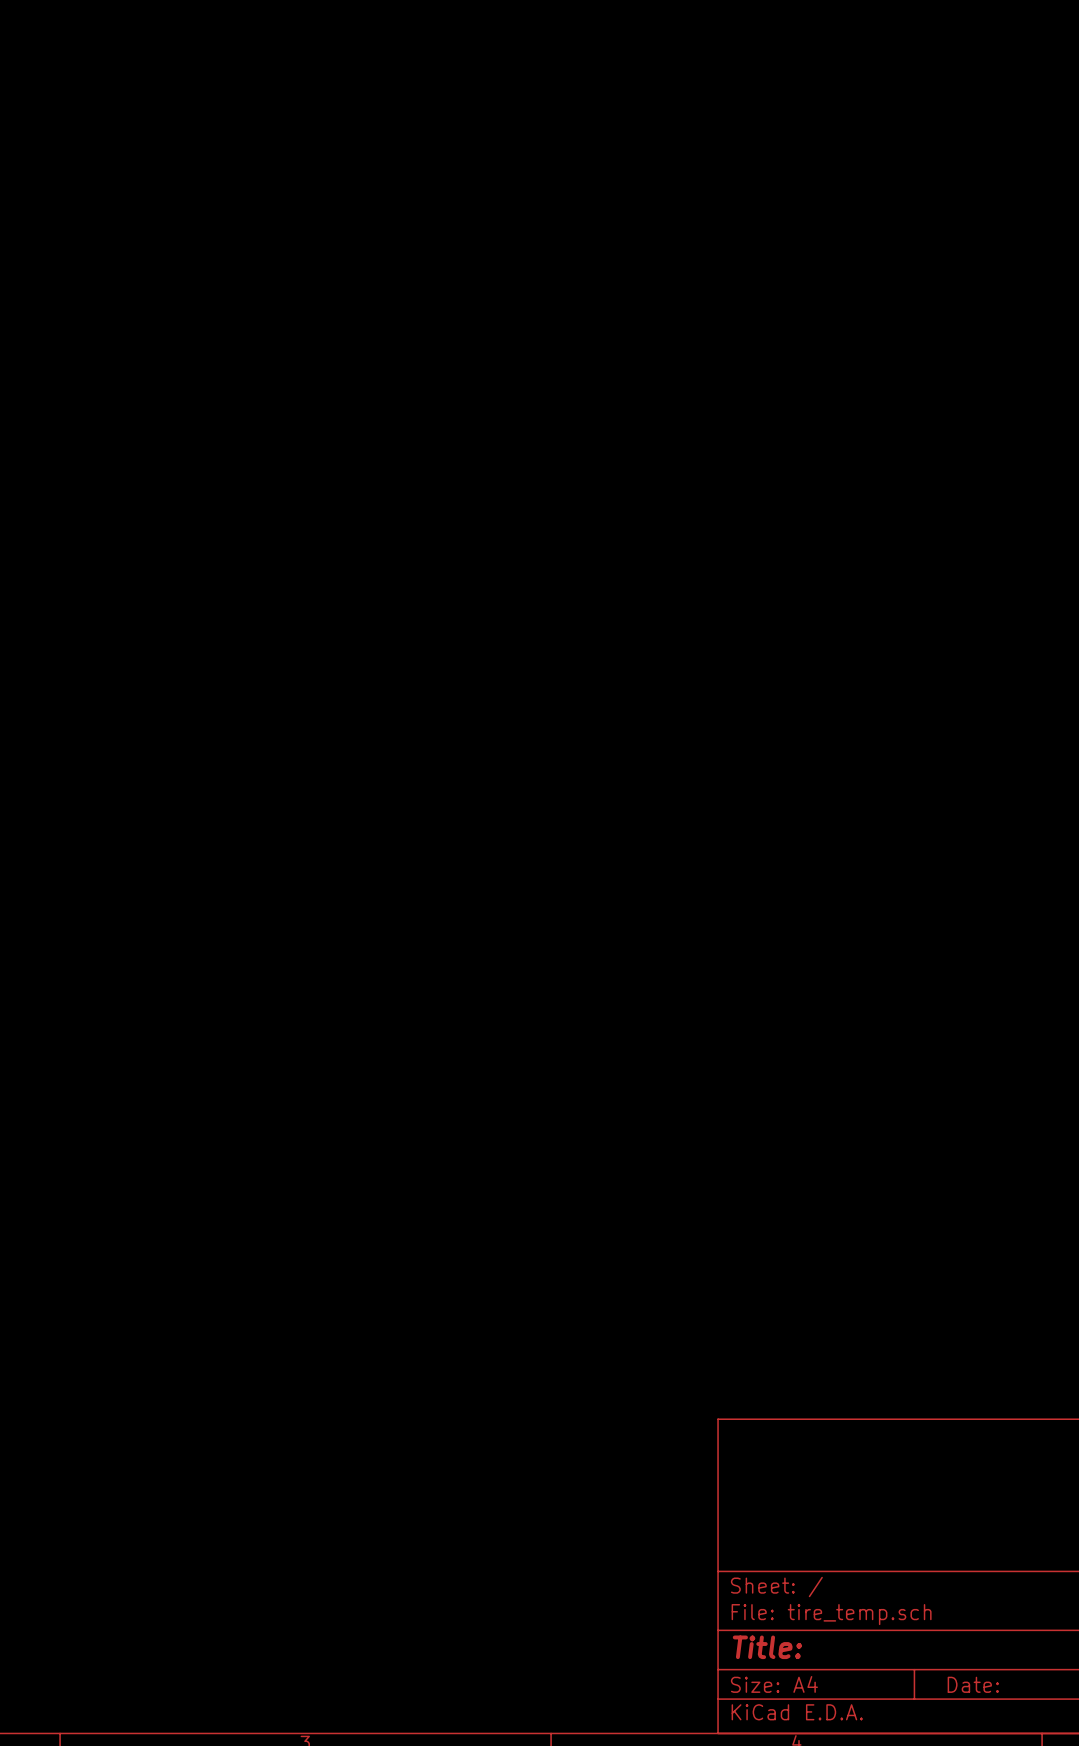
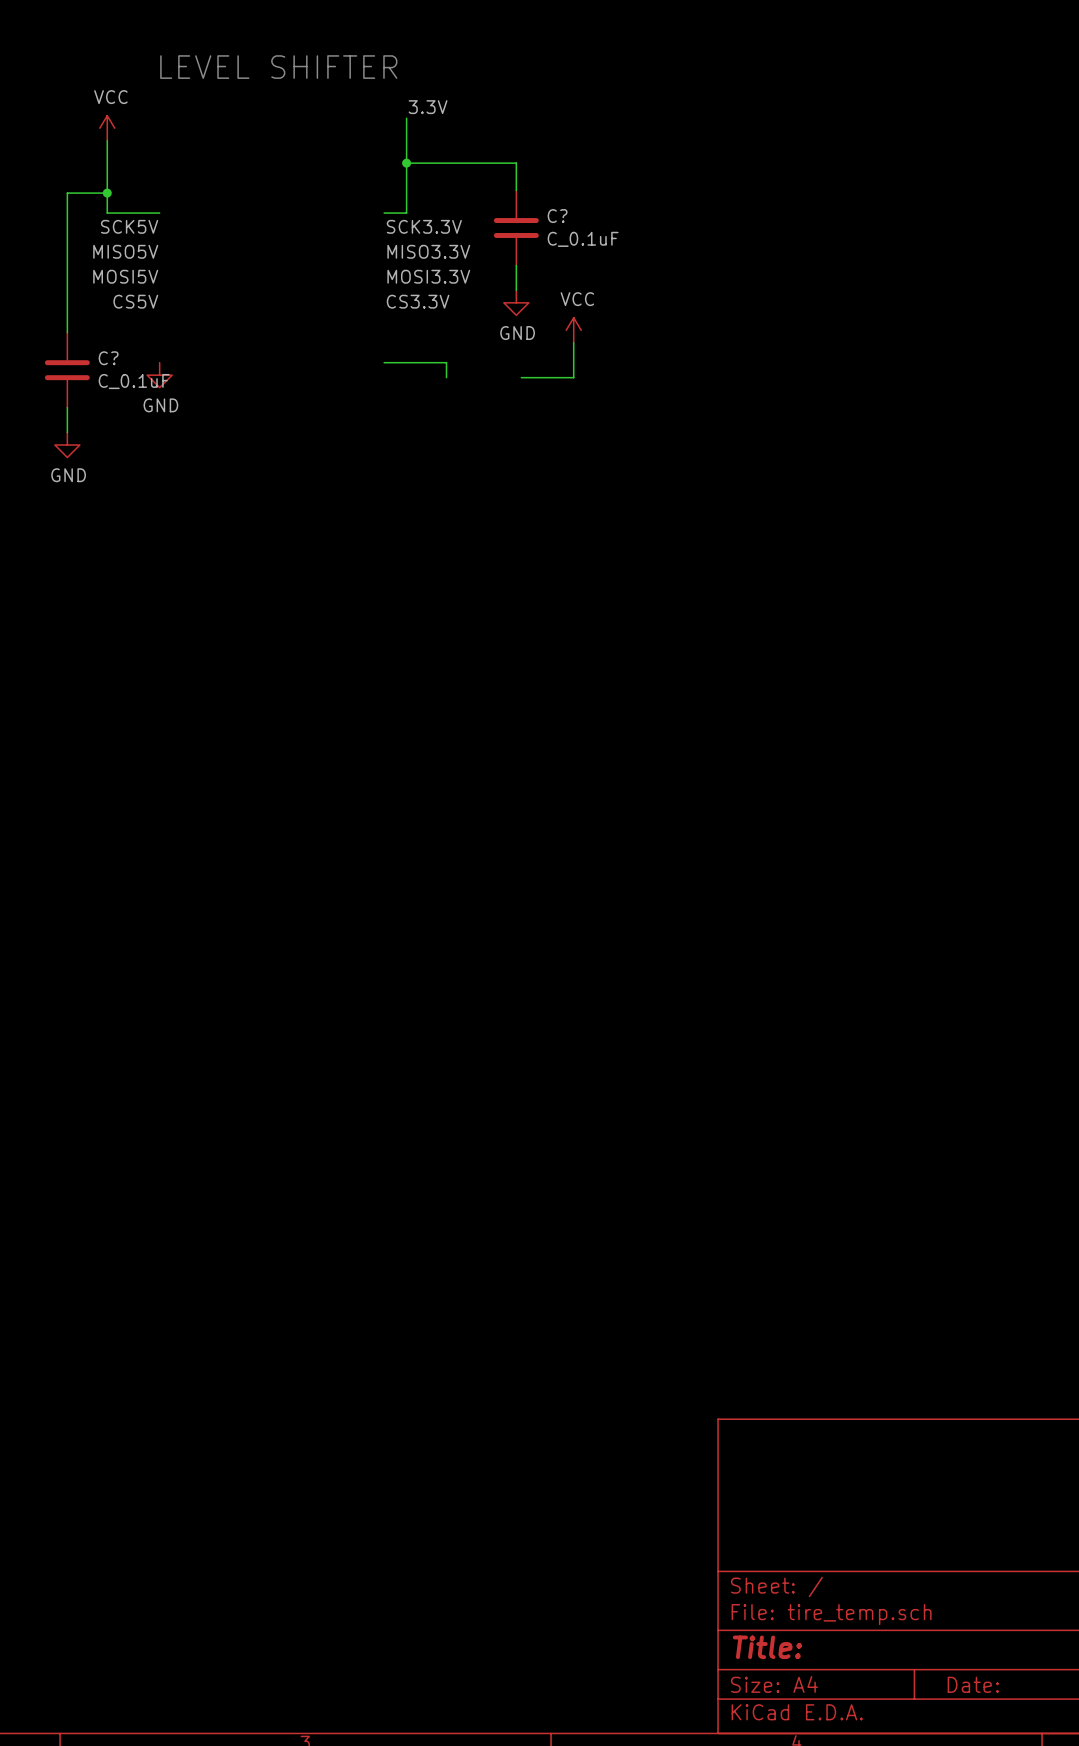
text: none -> LEVEL SHIFTER (278, 67)
label: none -> 3.3V (428, 107)
wire: none -> (406, 118) (406, 213) (384, 213)
power symbol: none -> VCC (107, 128)
wire: none -> (107, 140) (107, 213) (159, 213)
wire: none -> (406, 163) (516, 163) (516, 190)
junction: none -> (406, 163)
wire: none -> (107, 193) (67, 193) (67, 332)
junction: none -> (107, 193)
label: none -> SCK5V (129, 226)
label: none -> SCK3.3V (424, 226)
C?: none -> C_0.1uF (516, 228)
label: none -> MISO5V (125, 251)
label: none -> MISO3.3V (428, 251)
wire: none -> (516, 265) (516, 290)
label: none -> MOSI5V (125, 276)
label: none -> MOSI3.3V (428, 276)
label: none -> CS5V (135, 301)
label: none -> CS3.3V (418, 301)
power symbol: none -> GND (516, 302)
power symbol: none -> VCC (573, 330)
wire: none -> (573, 342) (573, 377) (521, 377)
wire: none -> (384, 362) (446, 362) (446, 377)
C?: none -> C_0.1uF (67, 370)
power symbol: none -> GND (159, 375)
wire: none -> (67, 407) (67, 432)
power symbol: none -> GND (67, 445)

